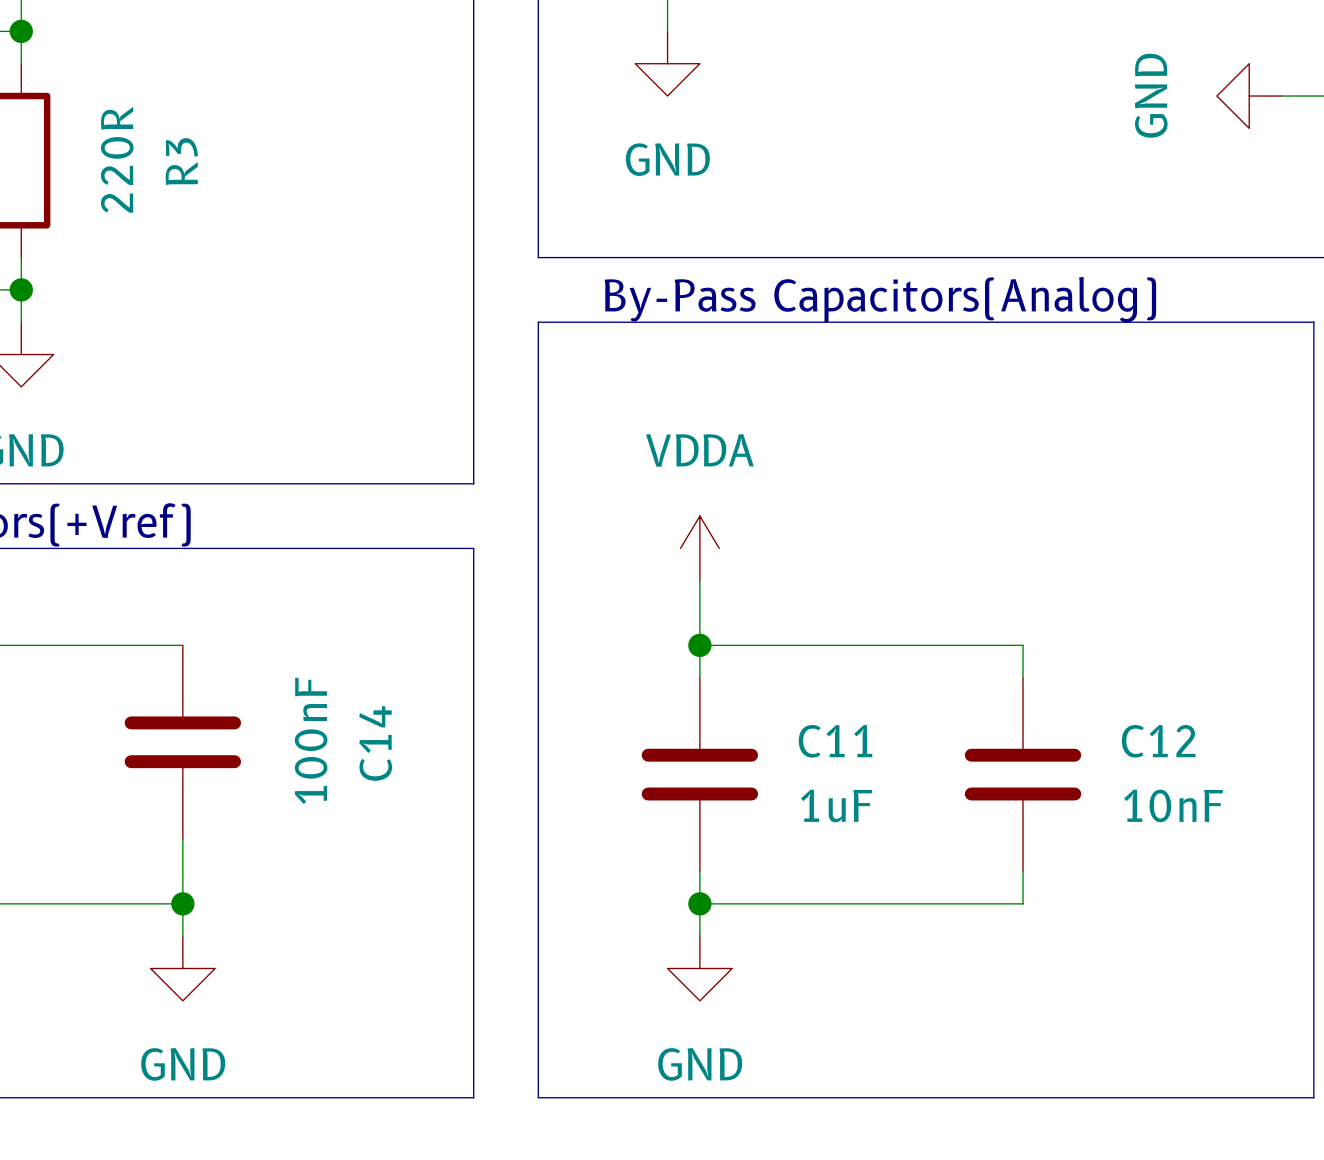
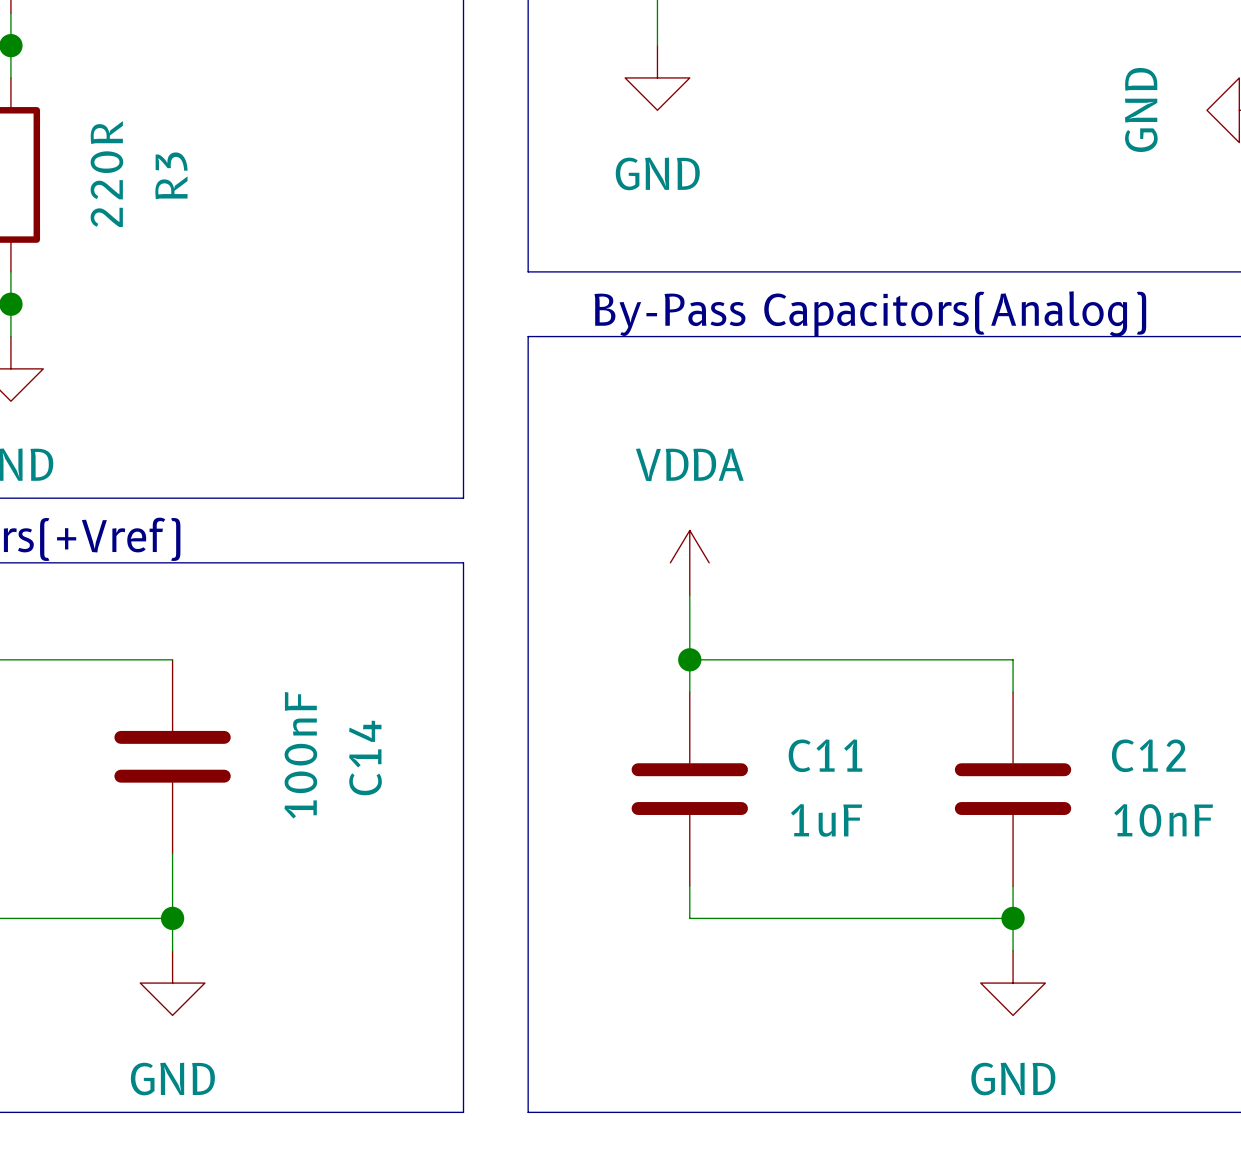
wire: (699, 903) (699, 936) -> (1013, 918) (1013, 950)
junction: (699, 903) -> none
junction: none -> (1013, 918)
power symbol: GND (699, 968) -> none
power symbol: none -> GND (1013, 983)

